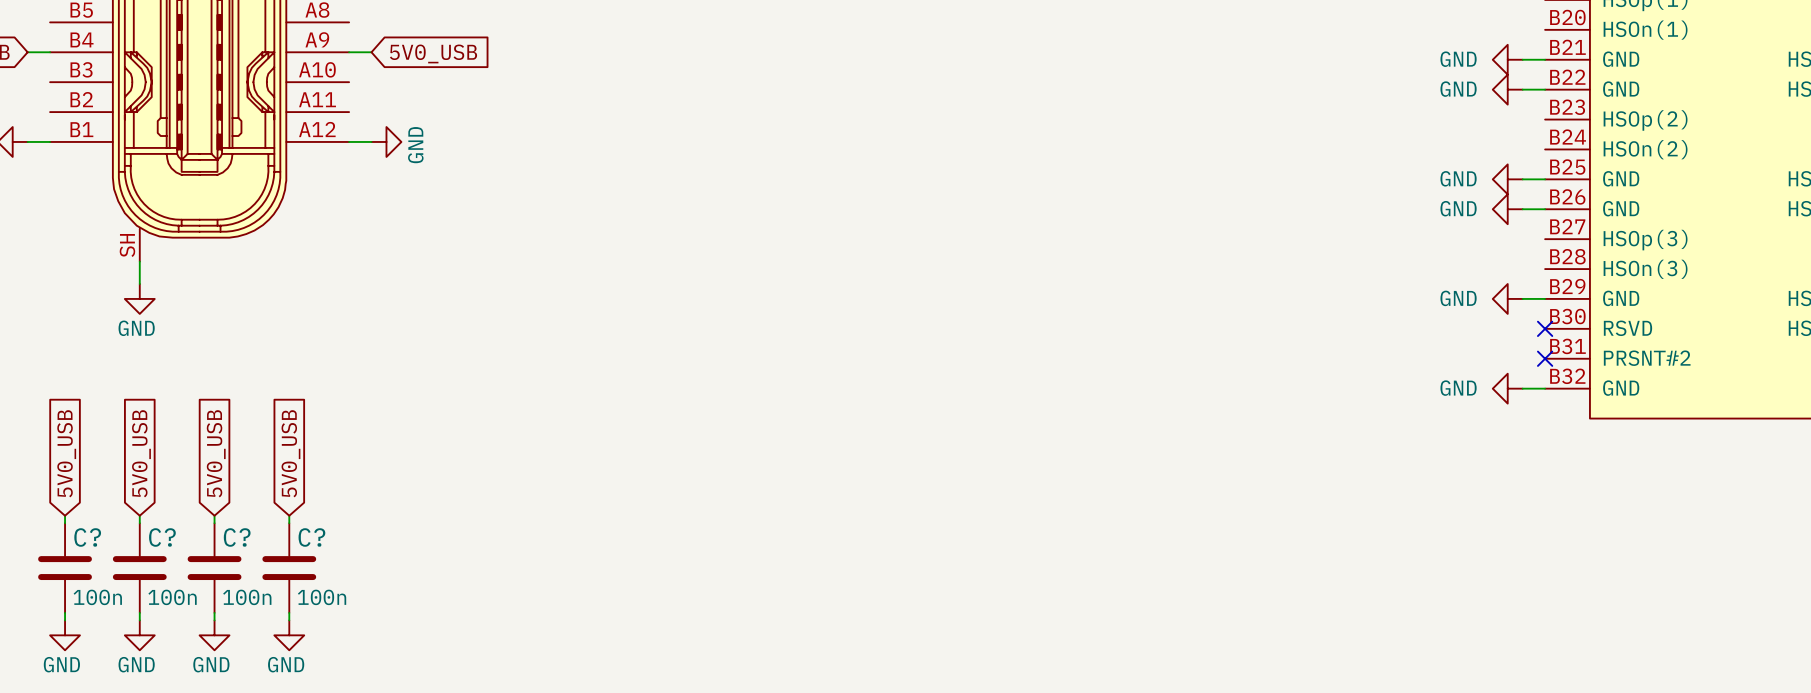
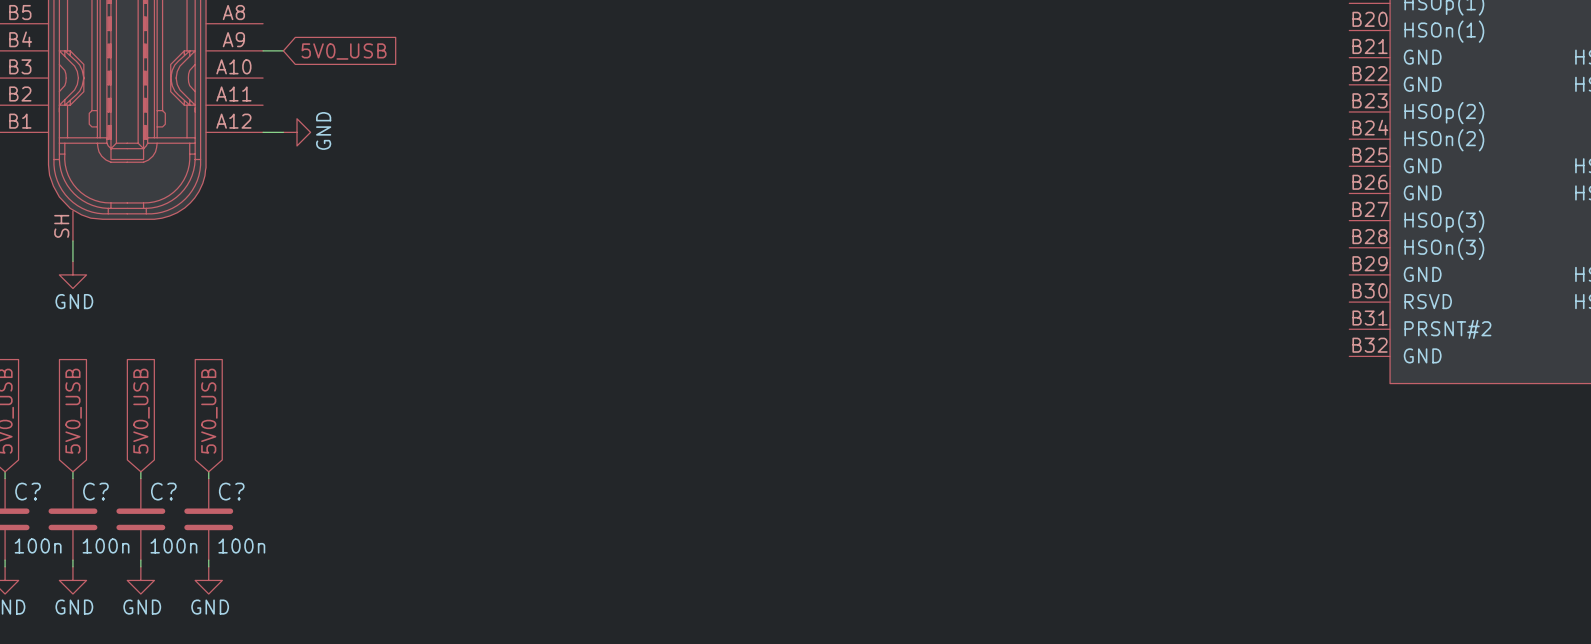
power symbol: GND (1507, 59) -> none
wire: (1522, 59) (1545, 59) -> none
power symbol: GND (1507, 89) -> none
wire: (1522, 89) (1545, 89) -> none
power symbol: GND (1507, 179) -> none
wire: (1522, 179) (1545, 179) -> none
power symbol: GND (1507, 209) -> none
wire: (1522, 209) (1545, 209) -> none
power symbol: GND (1507, 298) -> none
wire: (1522, 298) (1545, 298) -> none
no-connect mark: (1545, 328) -> none
no-connect mark: (1545, 358) -> none
power symbol: GND (1507, 388) -> none
wire: (1522, 388) (1545, 388) -> none

